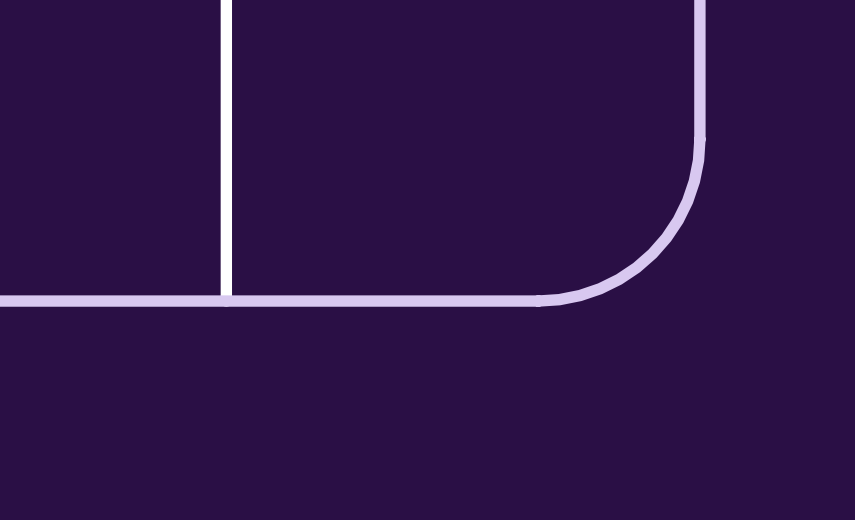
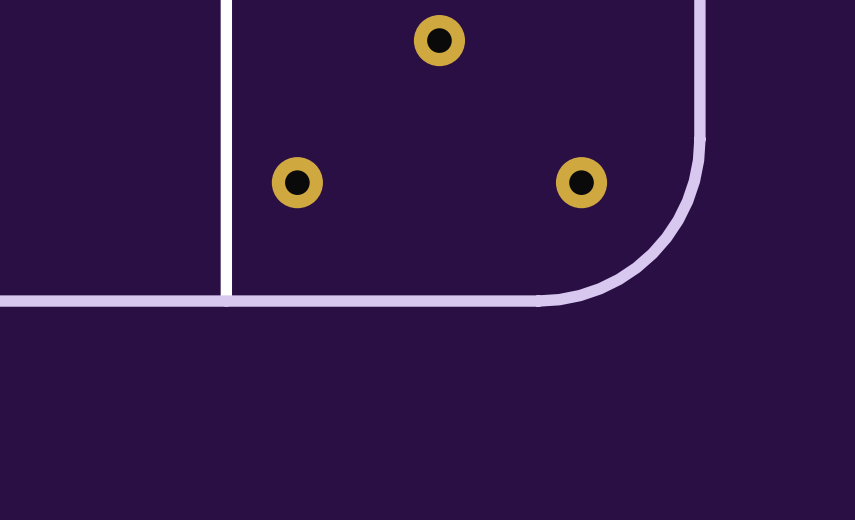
via: none -> (439, 40)
via: none -> (297, 182)
via: none -> (581, 182)

